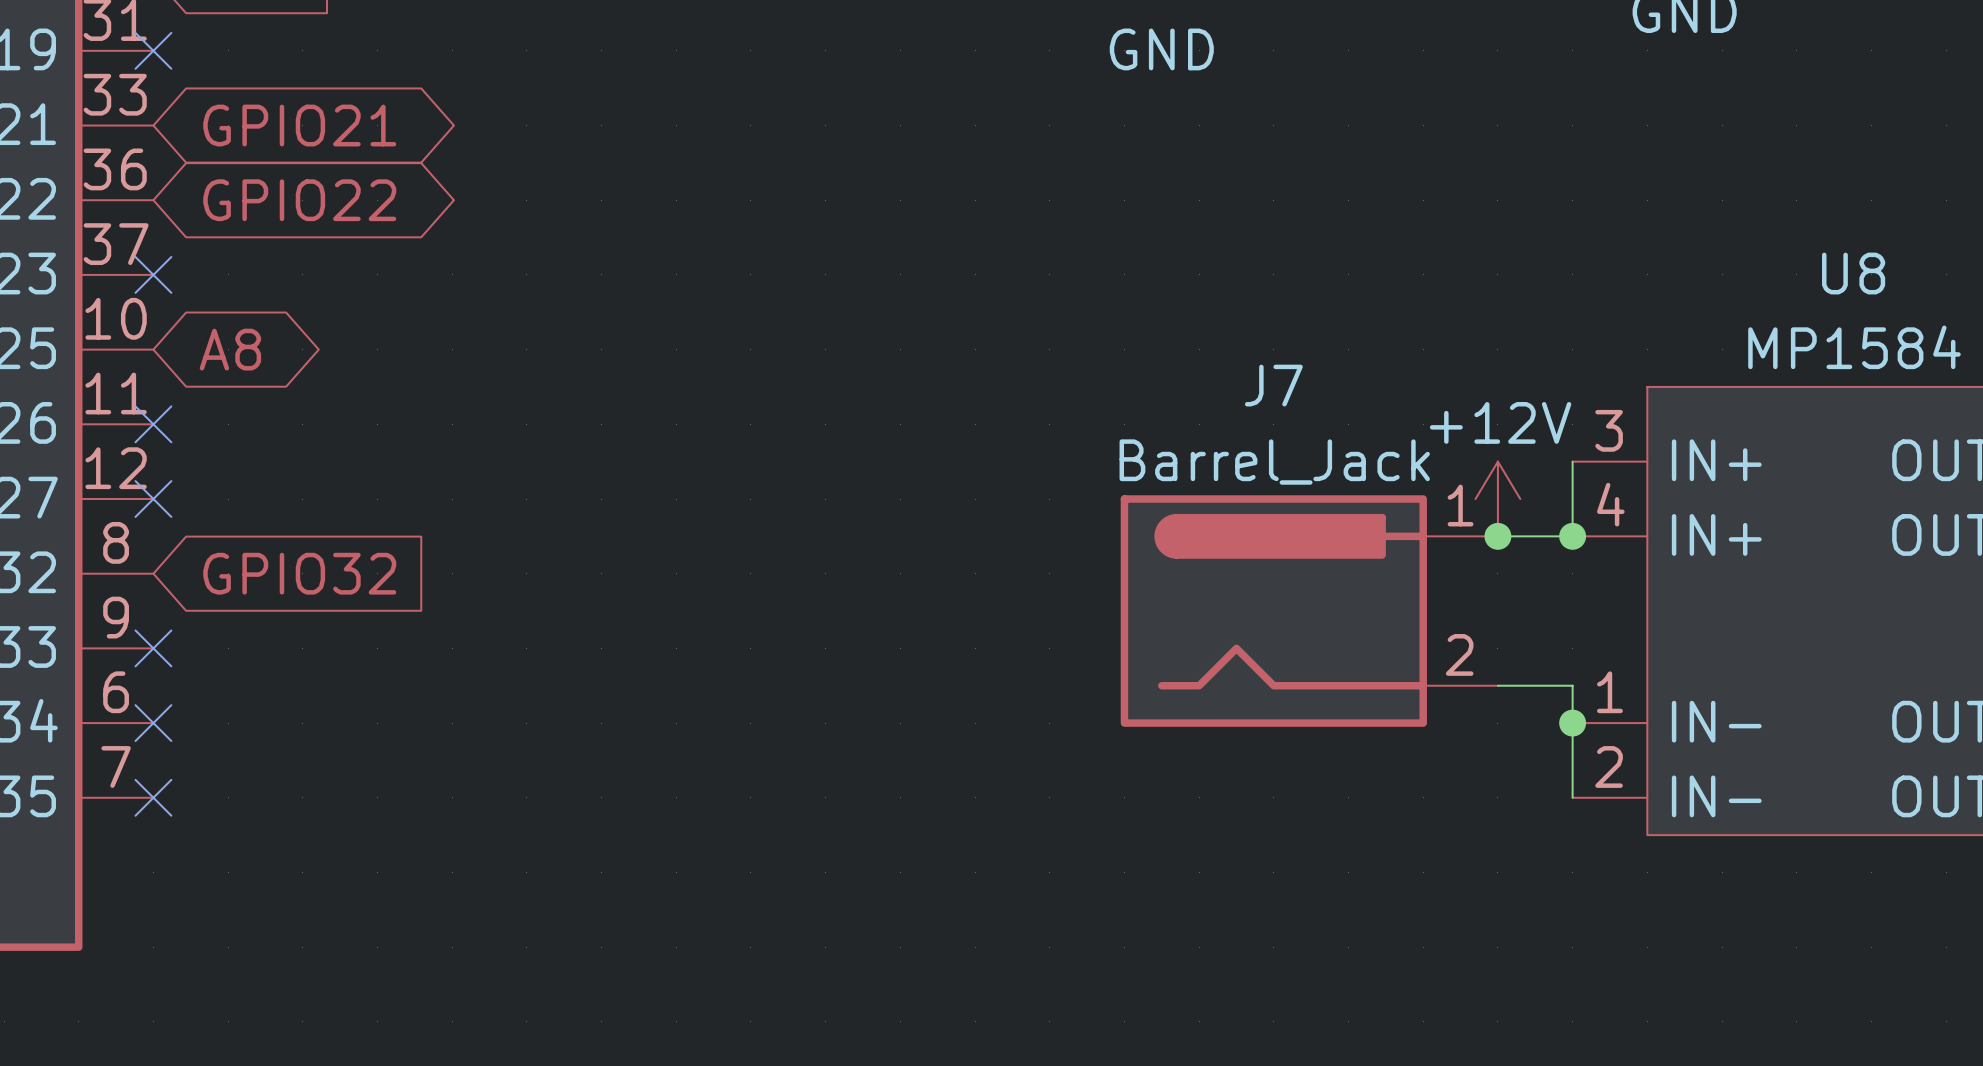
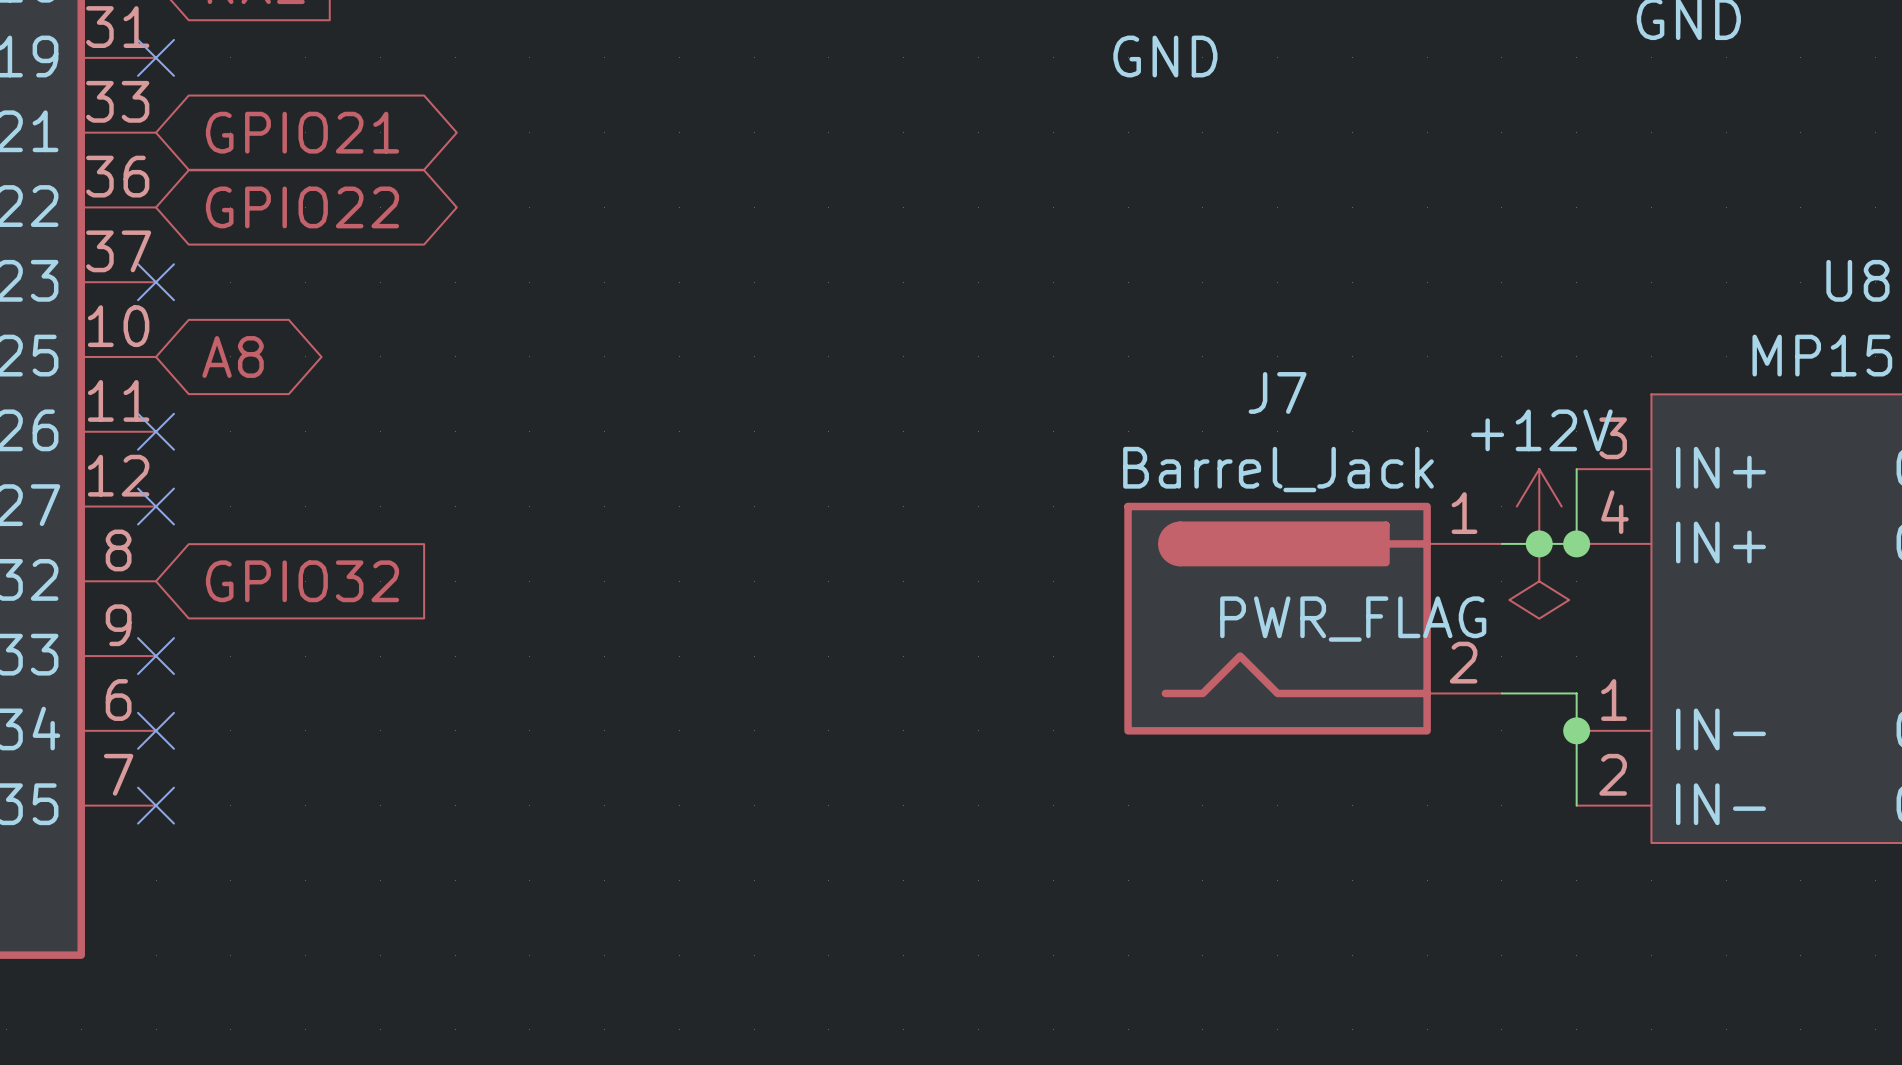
power symbol position: +12V (1497, 499) -> +12V (1539, 506)
junction position: (1497, 536) -> (1539, 543)
power symbol: none -> PWR_FLAG (1539, 581)

